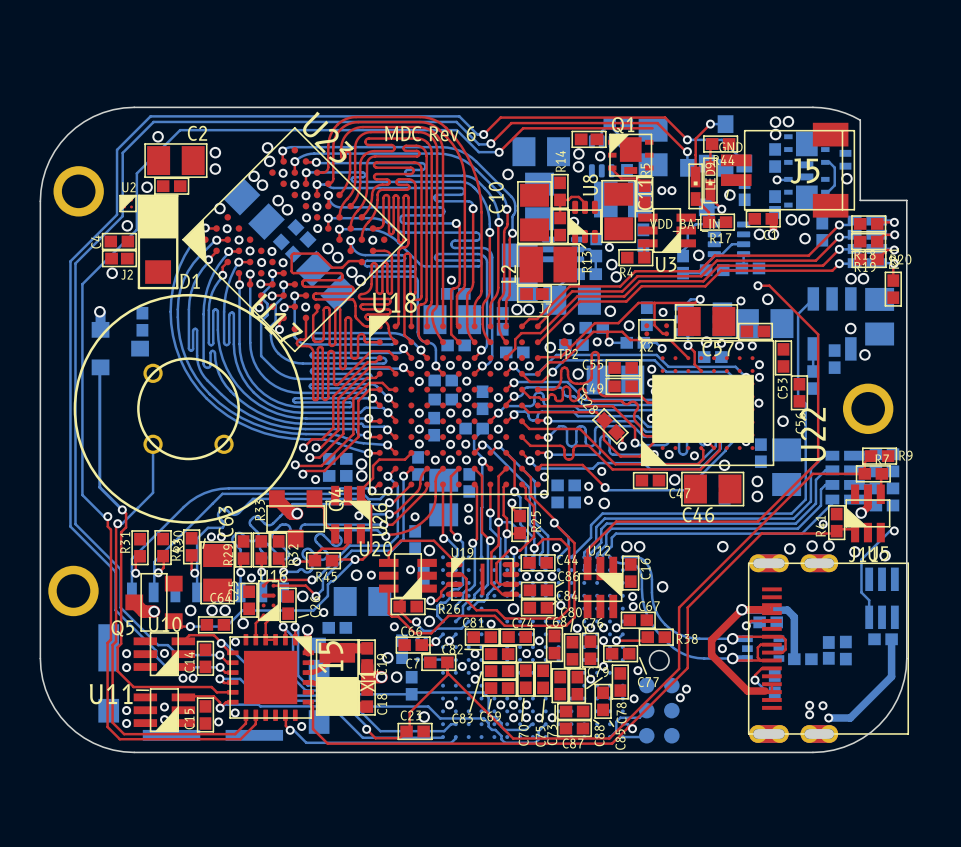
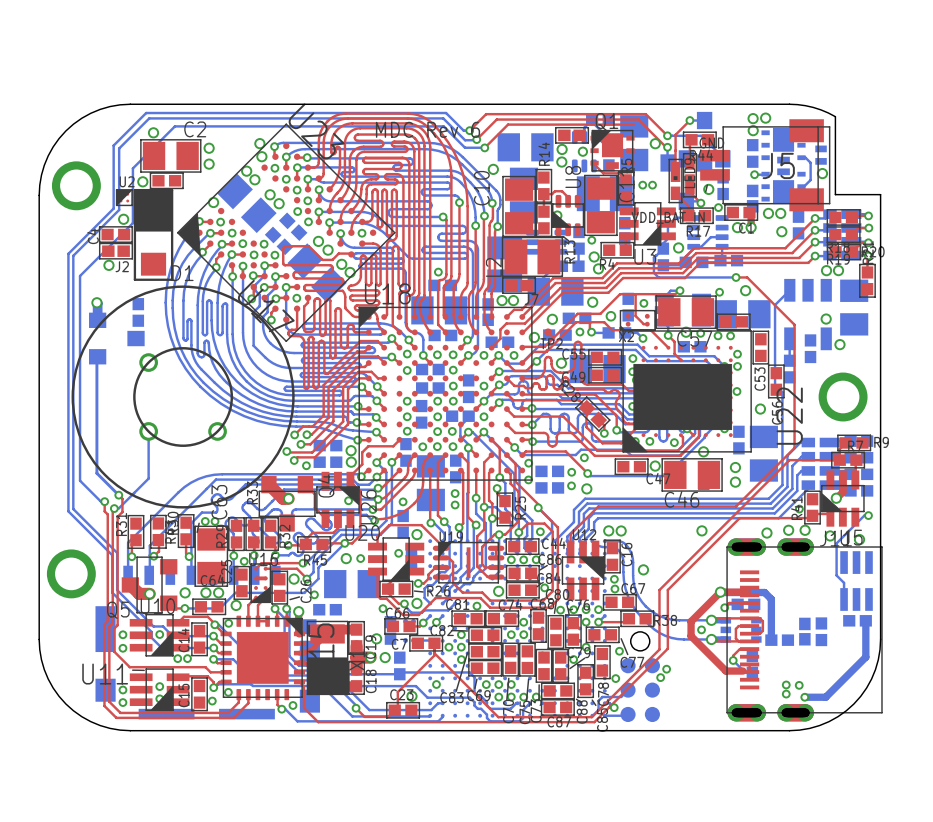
via: none -> (655, 143)
via: none -> (718, 207)
bottom track: none -> (663, 248) (653, 257) (653, 272) (658, 277) (736, 277)

